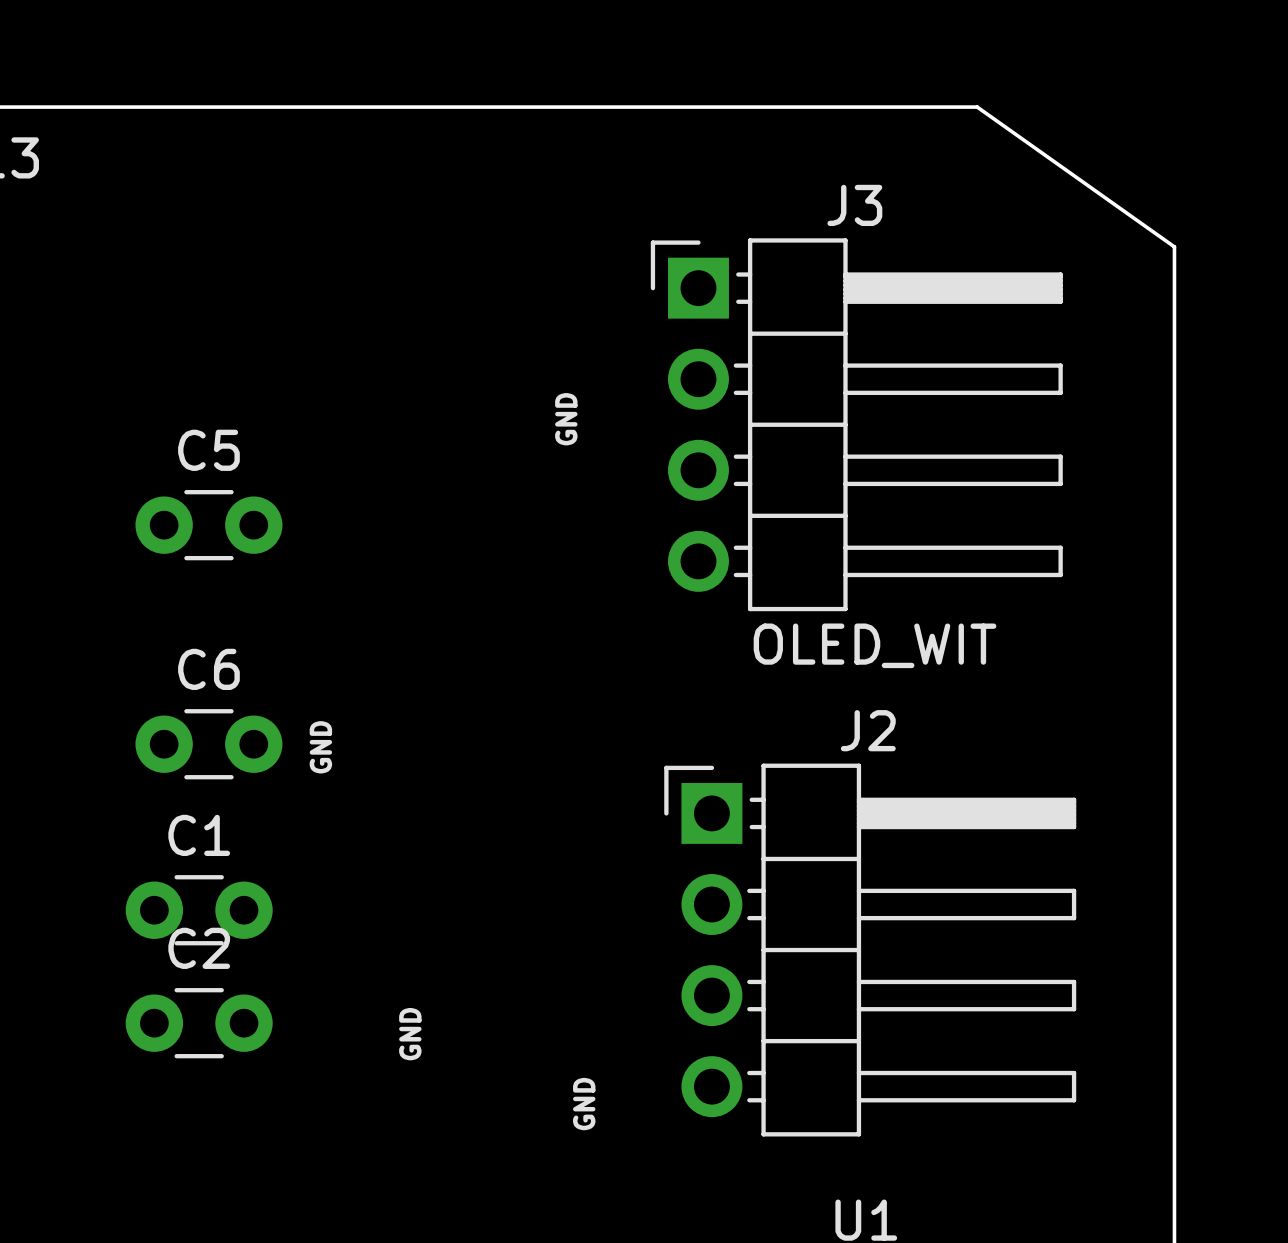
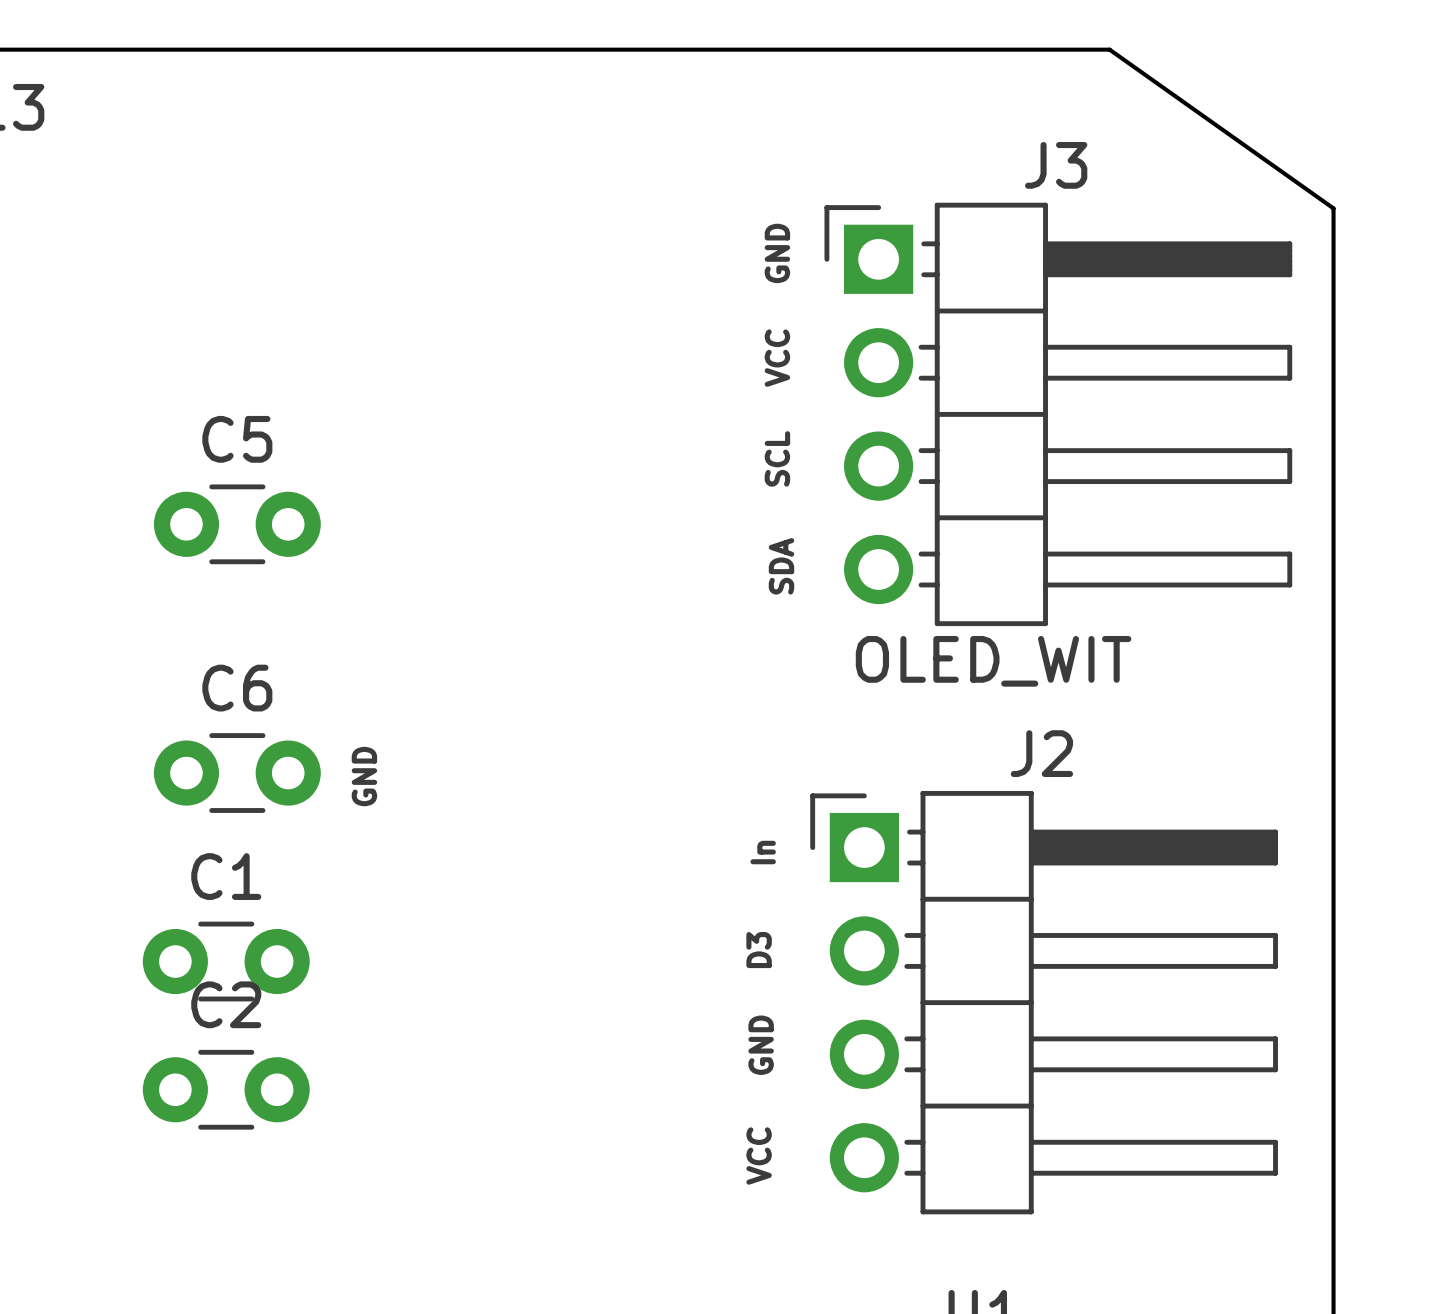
text: none -> VCC (777, 358)
text position: GND (566, 419) -> GND (777, 253)
J3 position: (856, 424) -> (1058, 414)
text: none -> SCL (777, 458)
text: none -> SDA (781, 566)
text: none -> In (763, 852)
text: none -> D3 (759, 950)
J2 position: (870, 950) -> (1044, 1002)
text: none -> GND (761, 1045)
text: GND (410, 1034) -> none
text: none -> VCC (759, 1156)
text: GND (584, 1104) -> none

